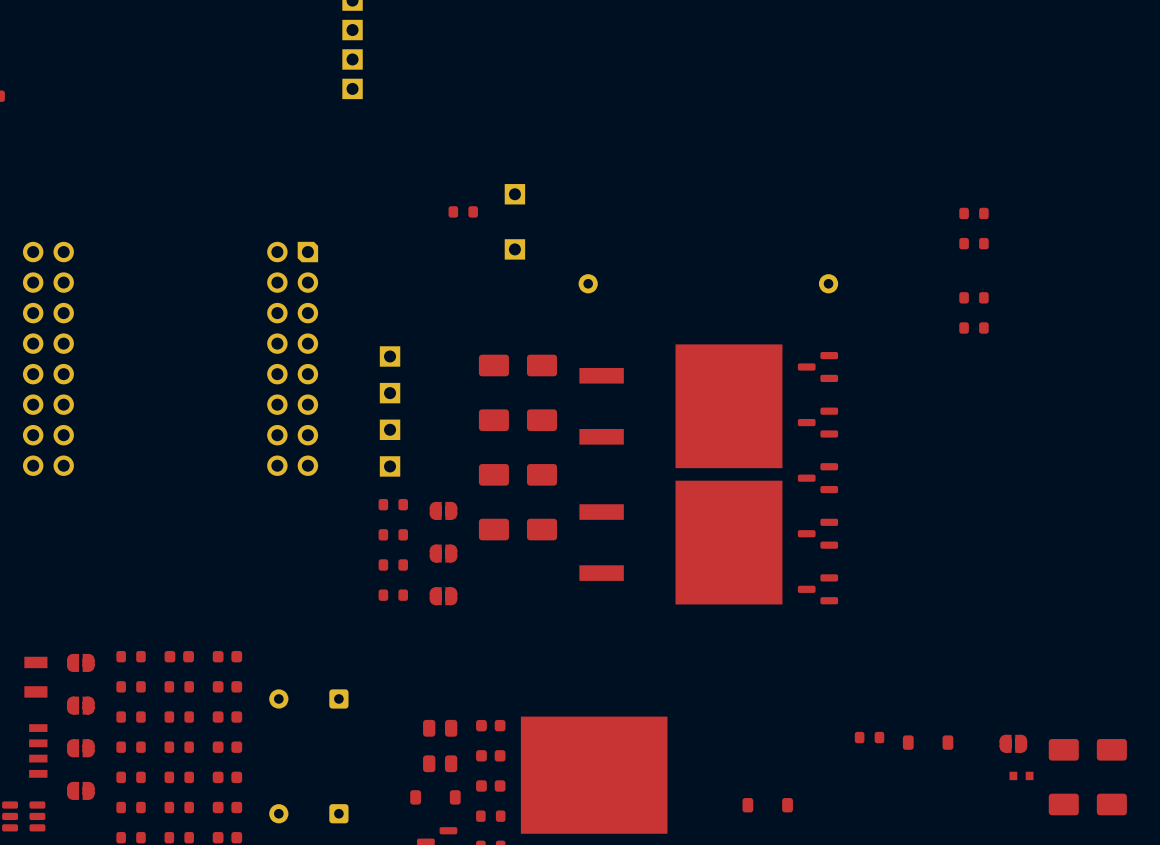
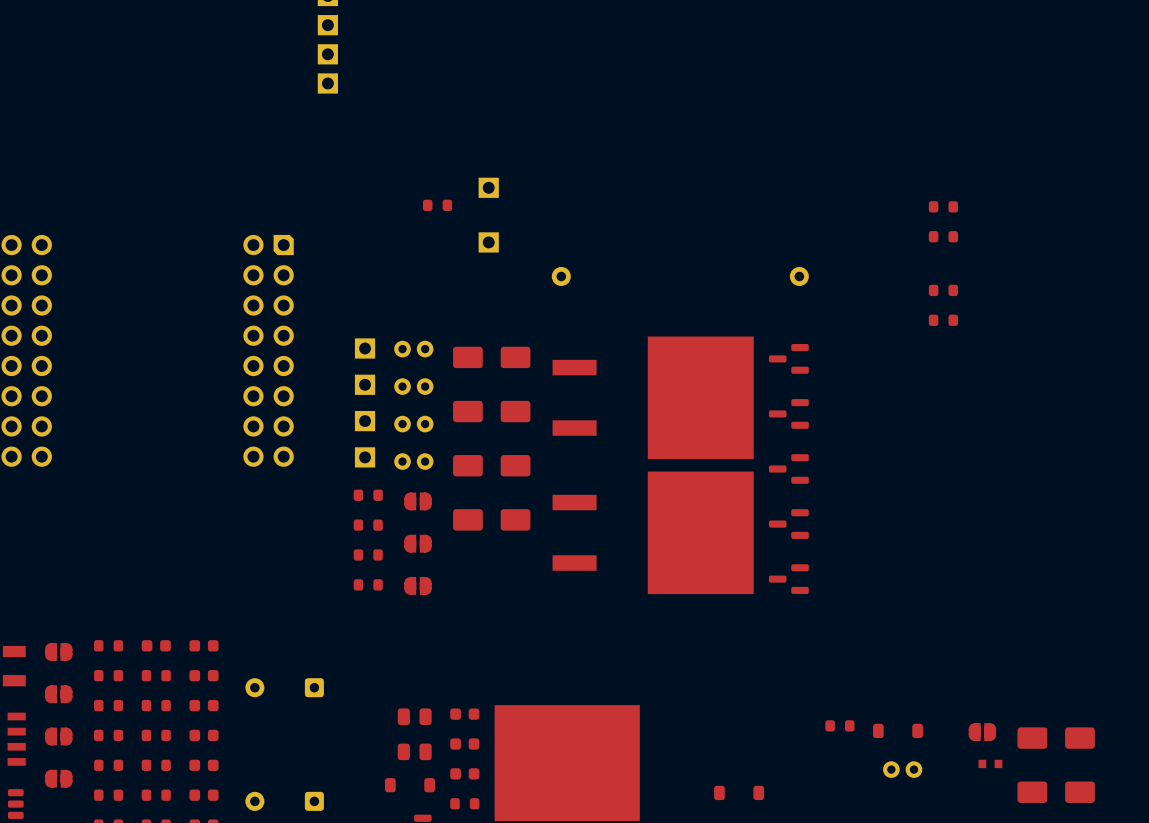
part: none -> (413, 349)
part: none -> (413, 386)
part: none -> (413, 424)
part: none -> (413, 461)
part: none -> (902, 769)

